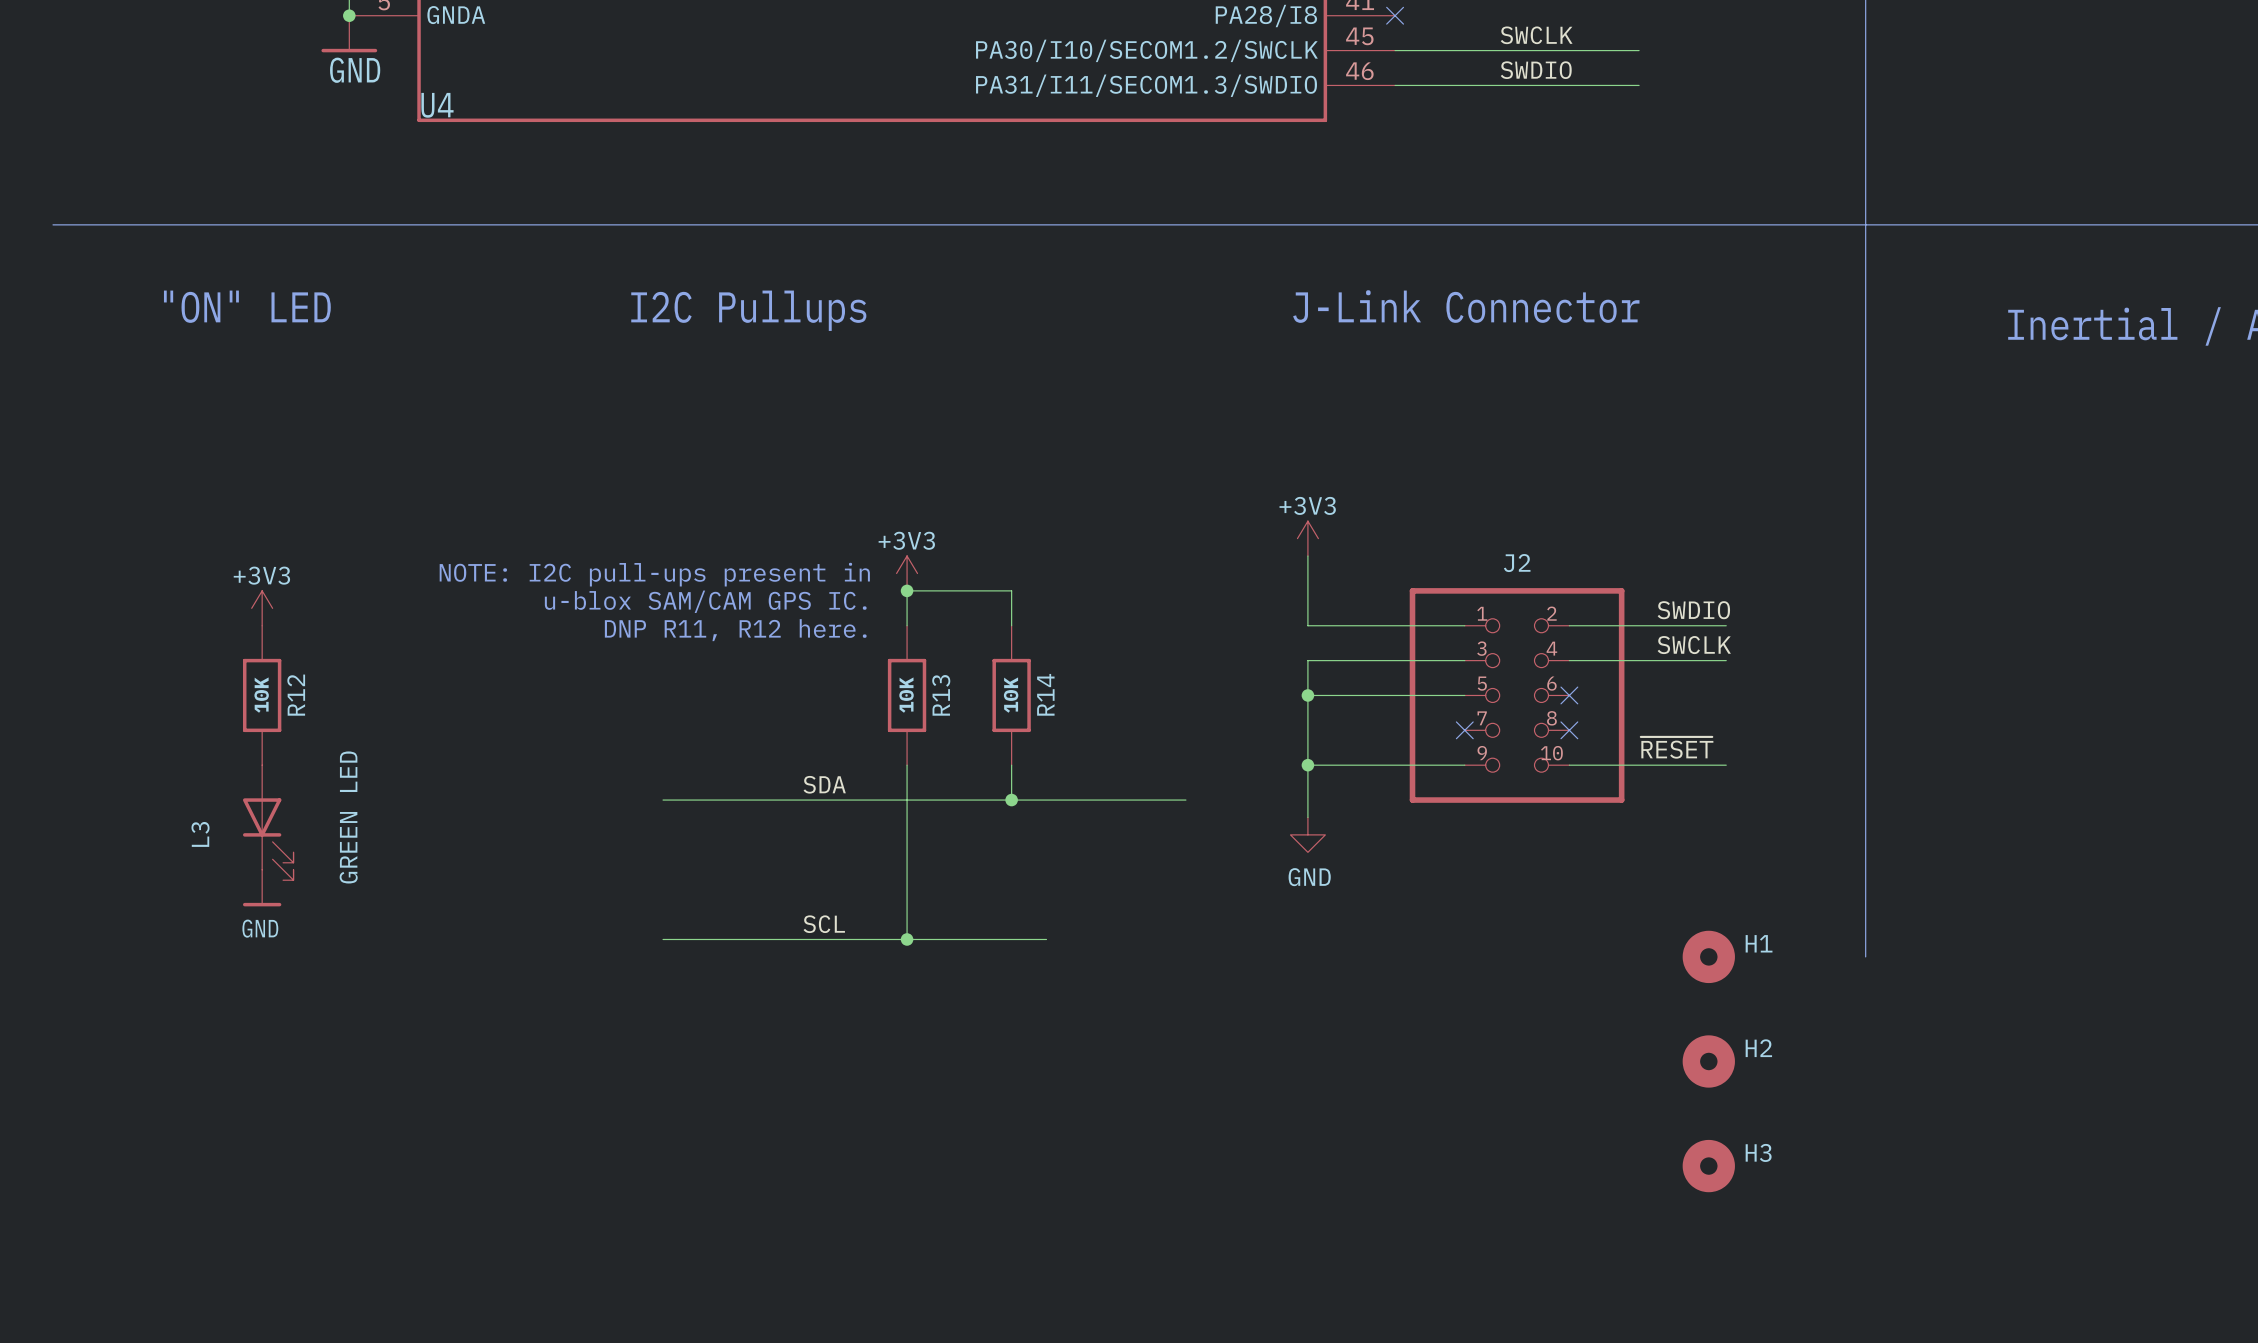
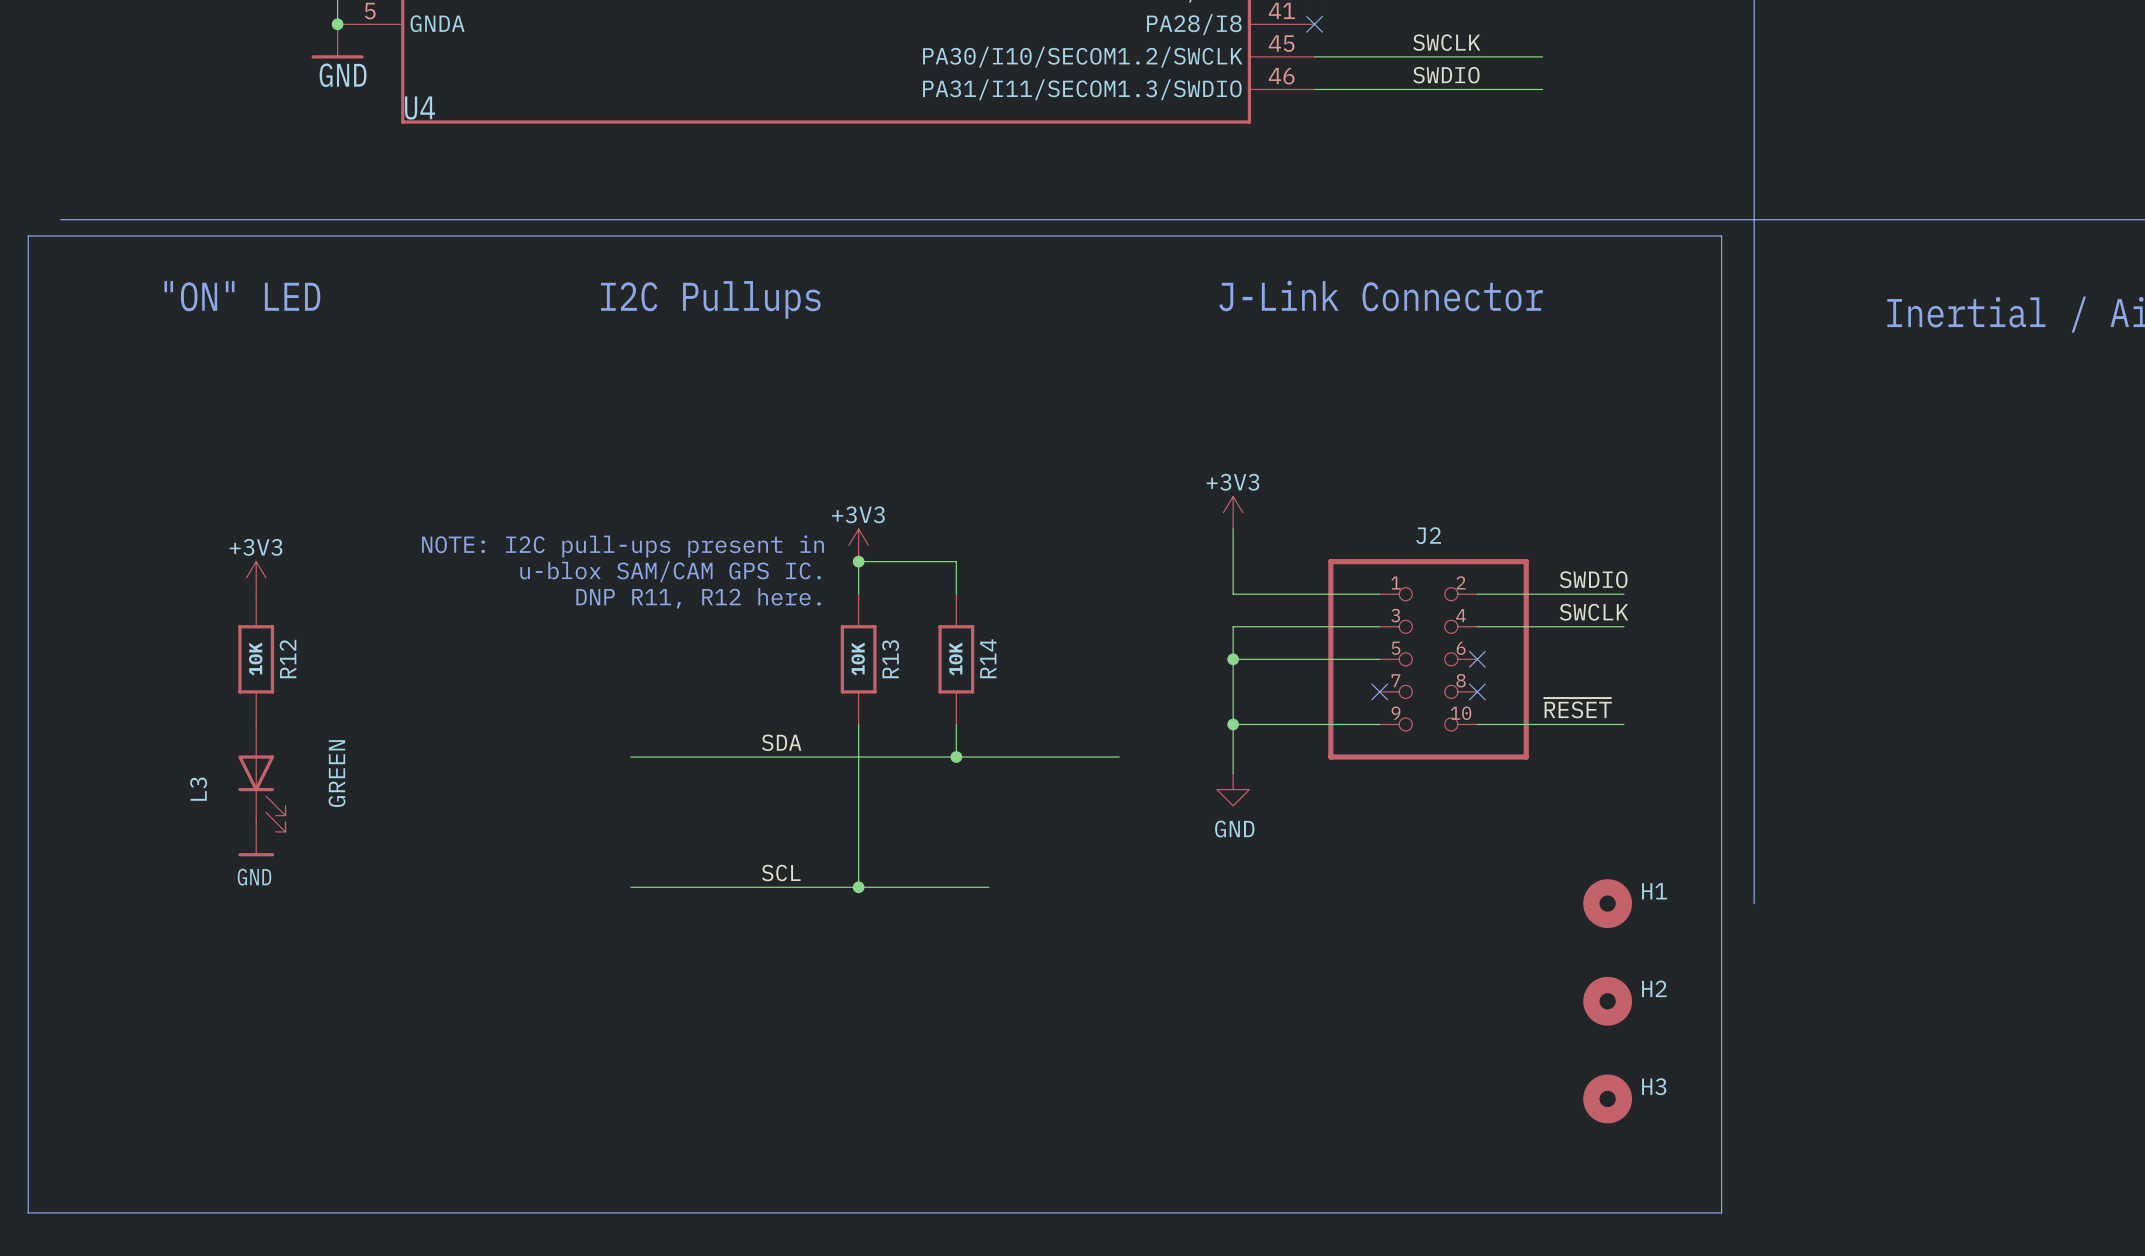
line: none -> (28, 236) (28, 1212) (1721, 1212) (1721, 236) (28, 236)
L3 value: GREEN LED (348, 817) -> GREEN (337, 773)

